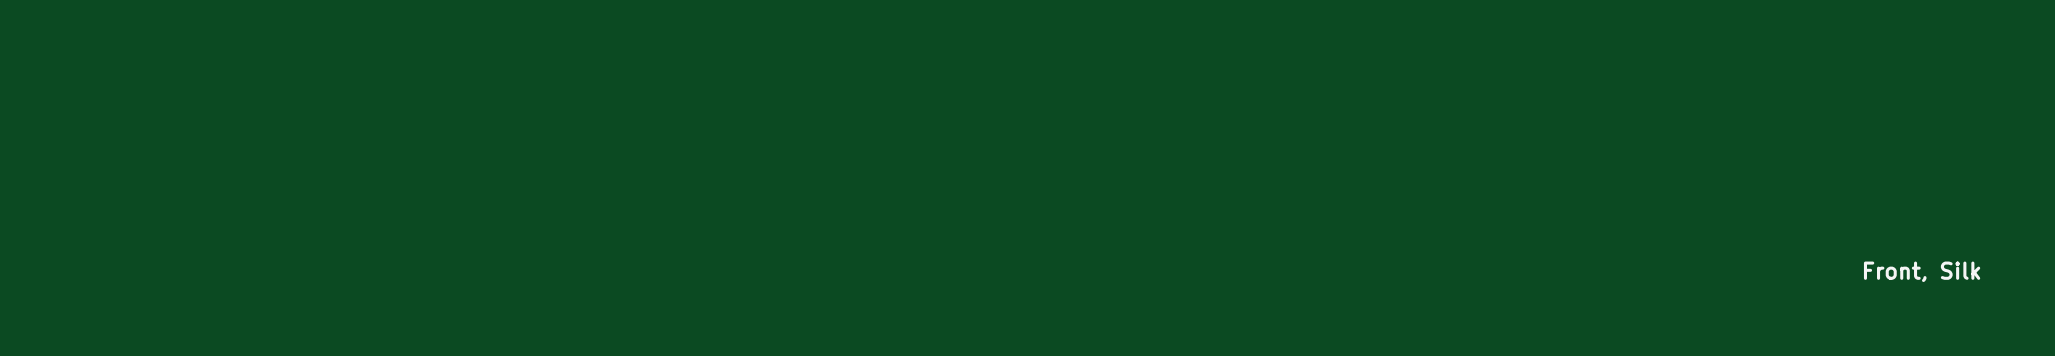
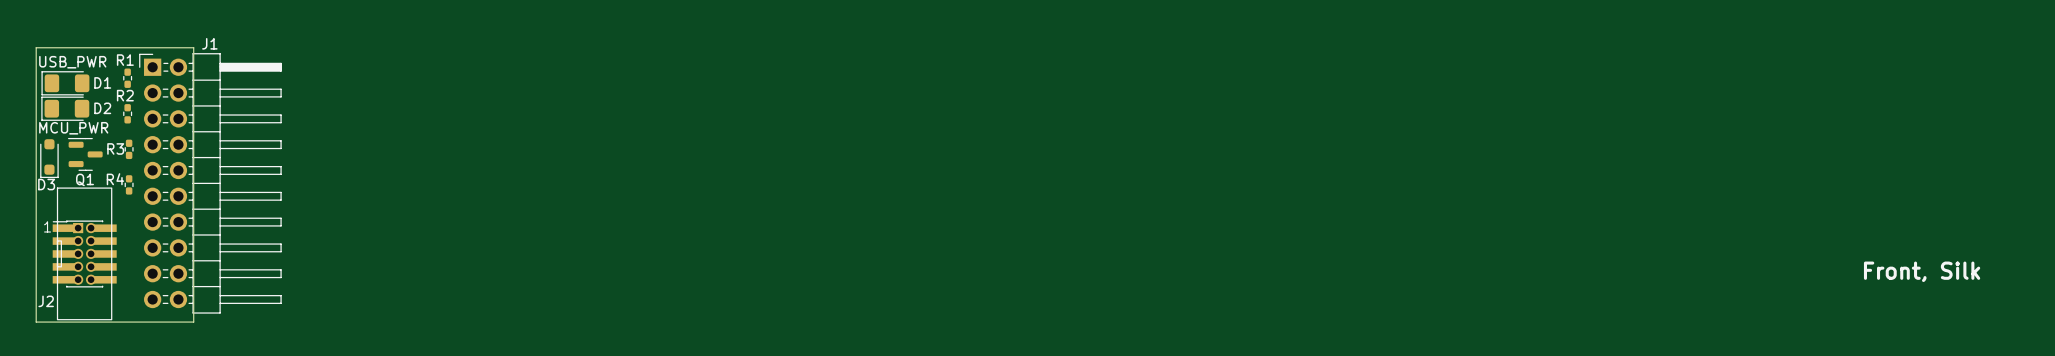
board edge: none -> (36, 47) (193, 47) (193, 322) (36, 322) (36, 47)
text: none -> USB_PWR (72, 62)
R1: none -> (127, 78)
D1: none -> (65, 83)
D2: none -> (65, 108)
R2: none -> (127, 113)
text: none -> MCU_PWR (73, 128)
R3: none -> (129, 149)
Q1: none -> (85, 154)
D3: none -> (49, 158)
J1: none -> (210, 183)
R4: none -> (129, 184)
part: none -> (84, 253)
J2: none -> (84, 253)

